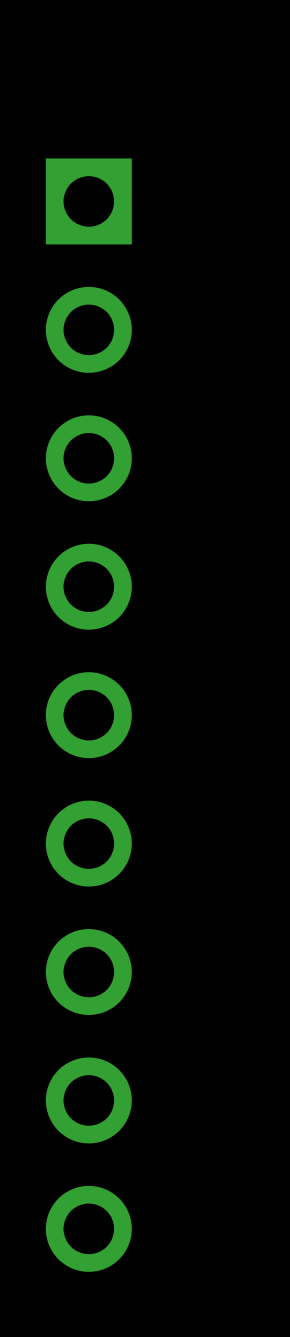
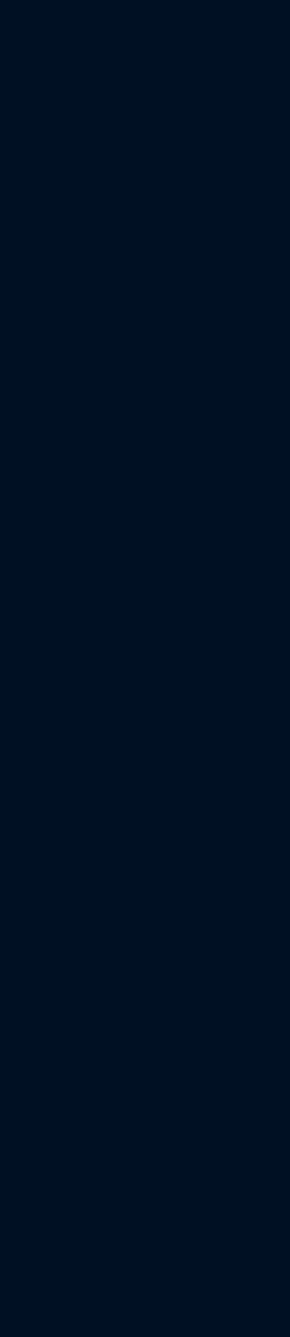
part: (88, 715) -> none

